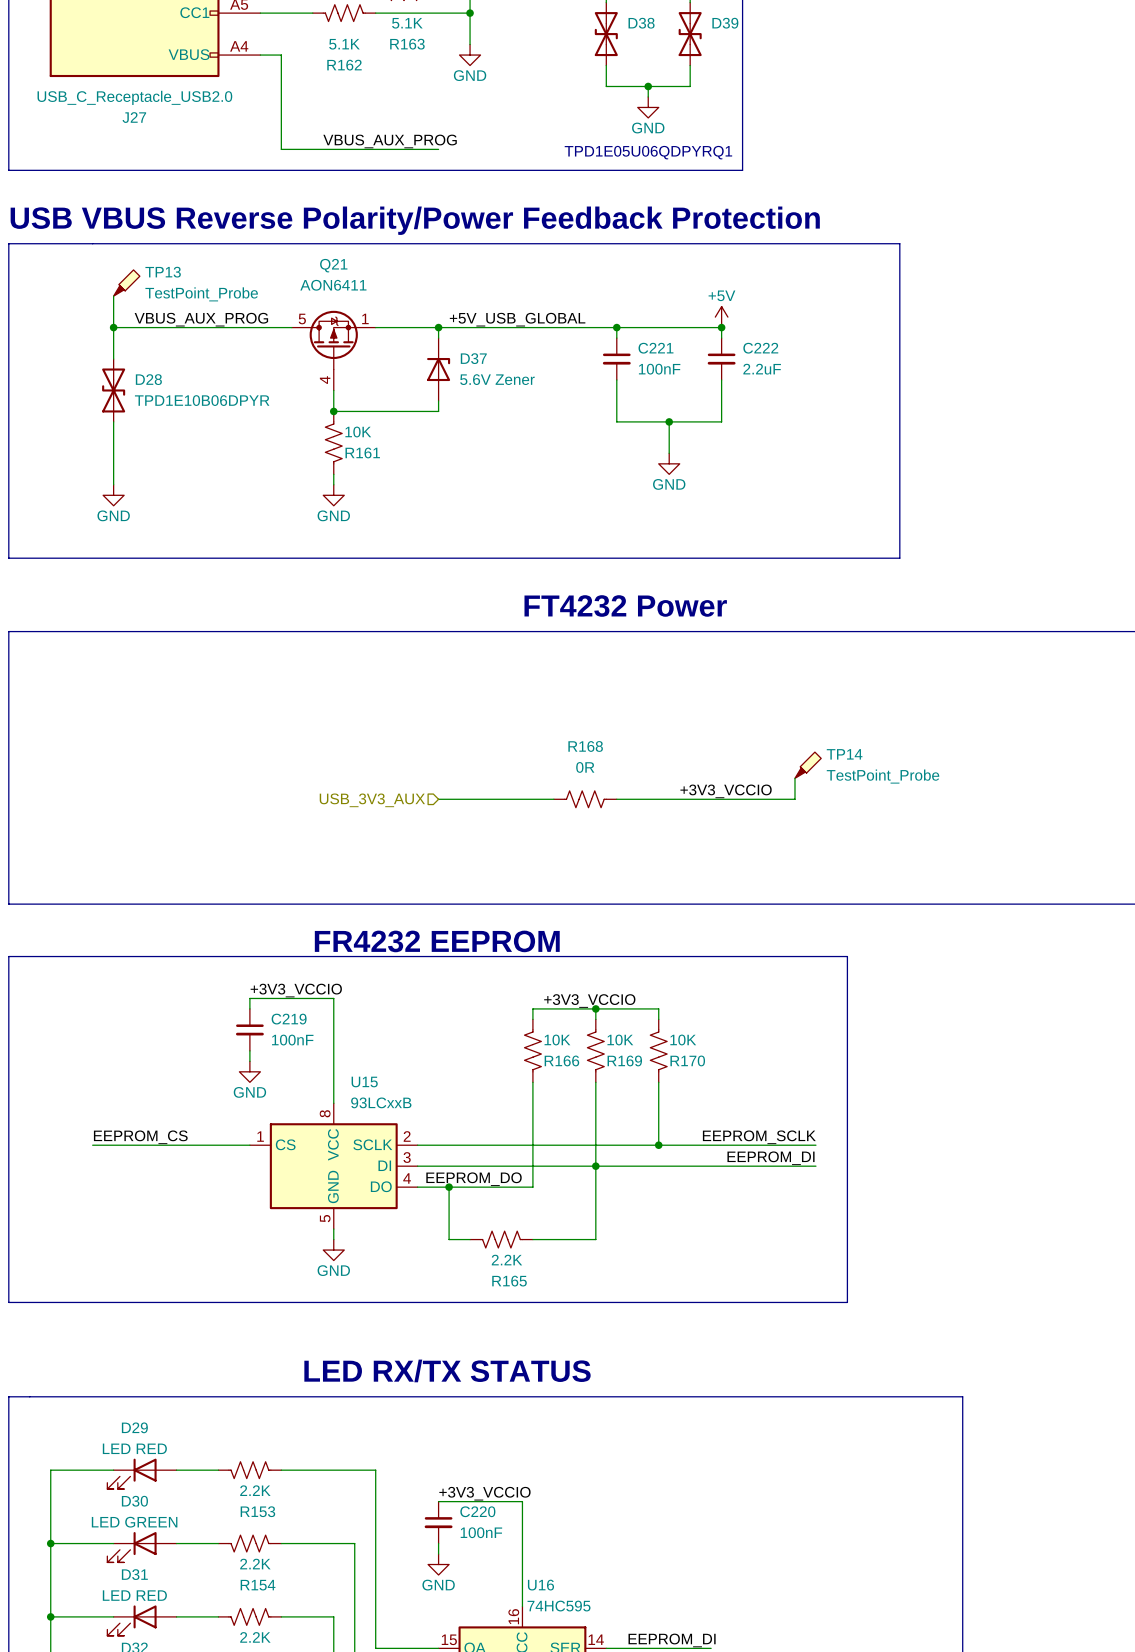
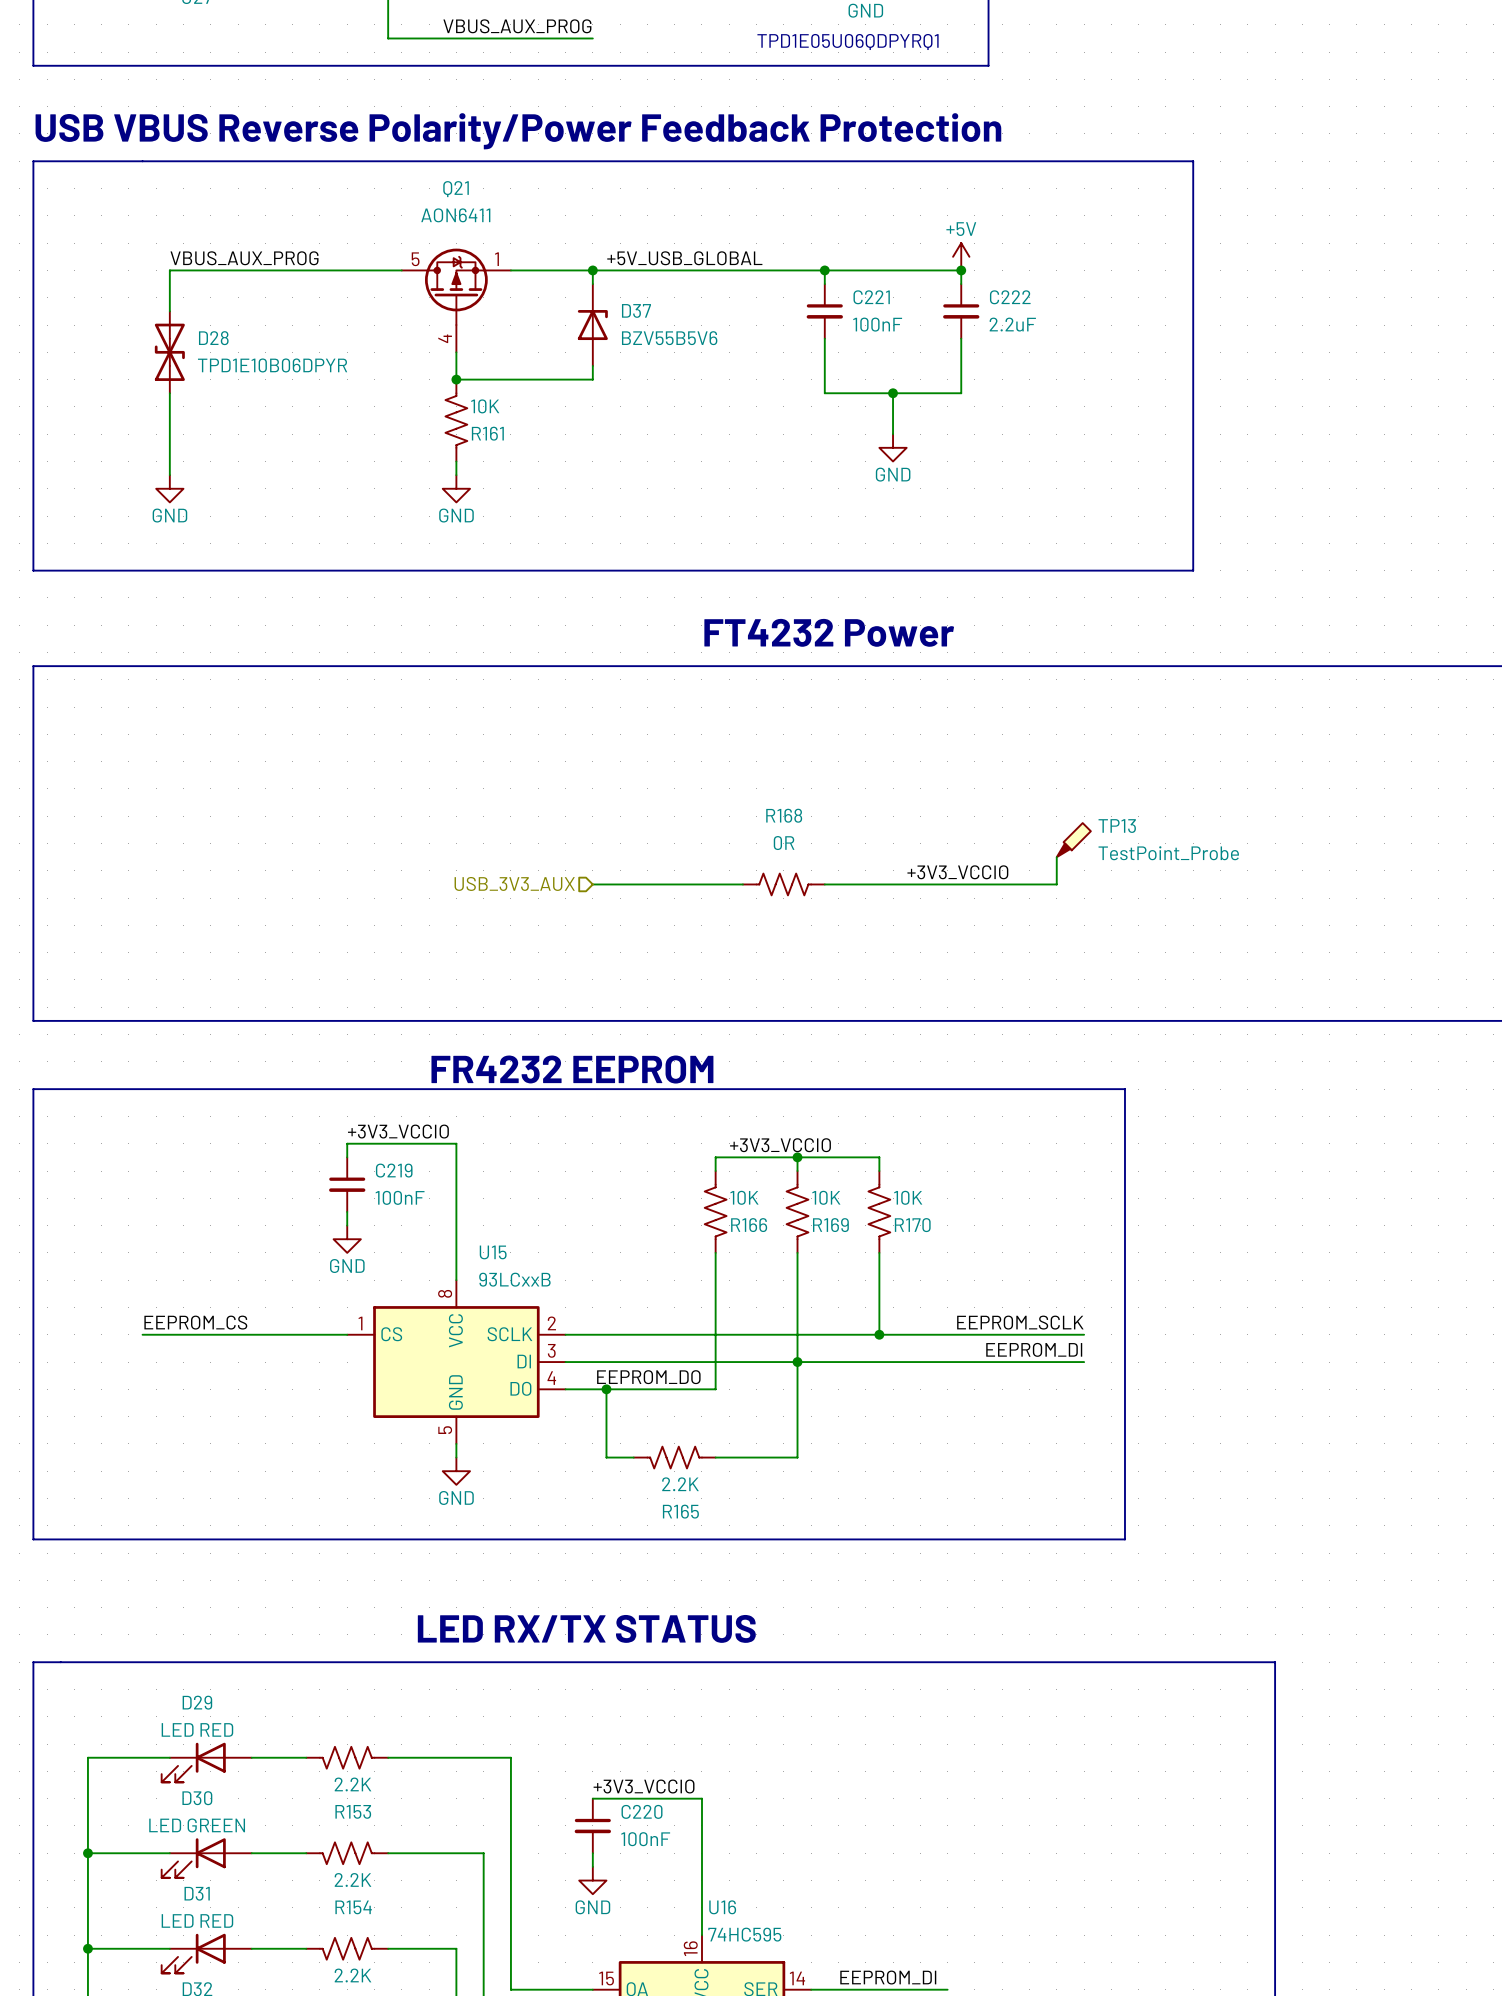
TP13: TestPoint_Probe (126, 283) -> none
wire: (113, 296) (113, 327) -> none
label position: VBUS_AUX_PROG (201, 319) -> VBUS_AUX_PROG (244, 258)
junction: (113, 327) -> none
D37 value: 5.6V Zener (497, 379) -> BZV55B5V6 (669, 338)
TP14 name: TP14 (844, 754) -> TP13 (1117, 826)

